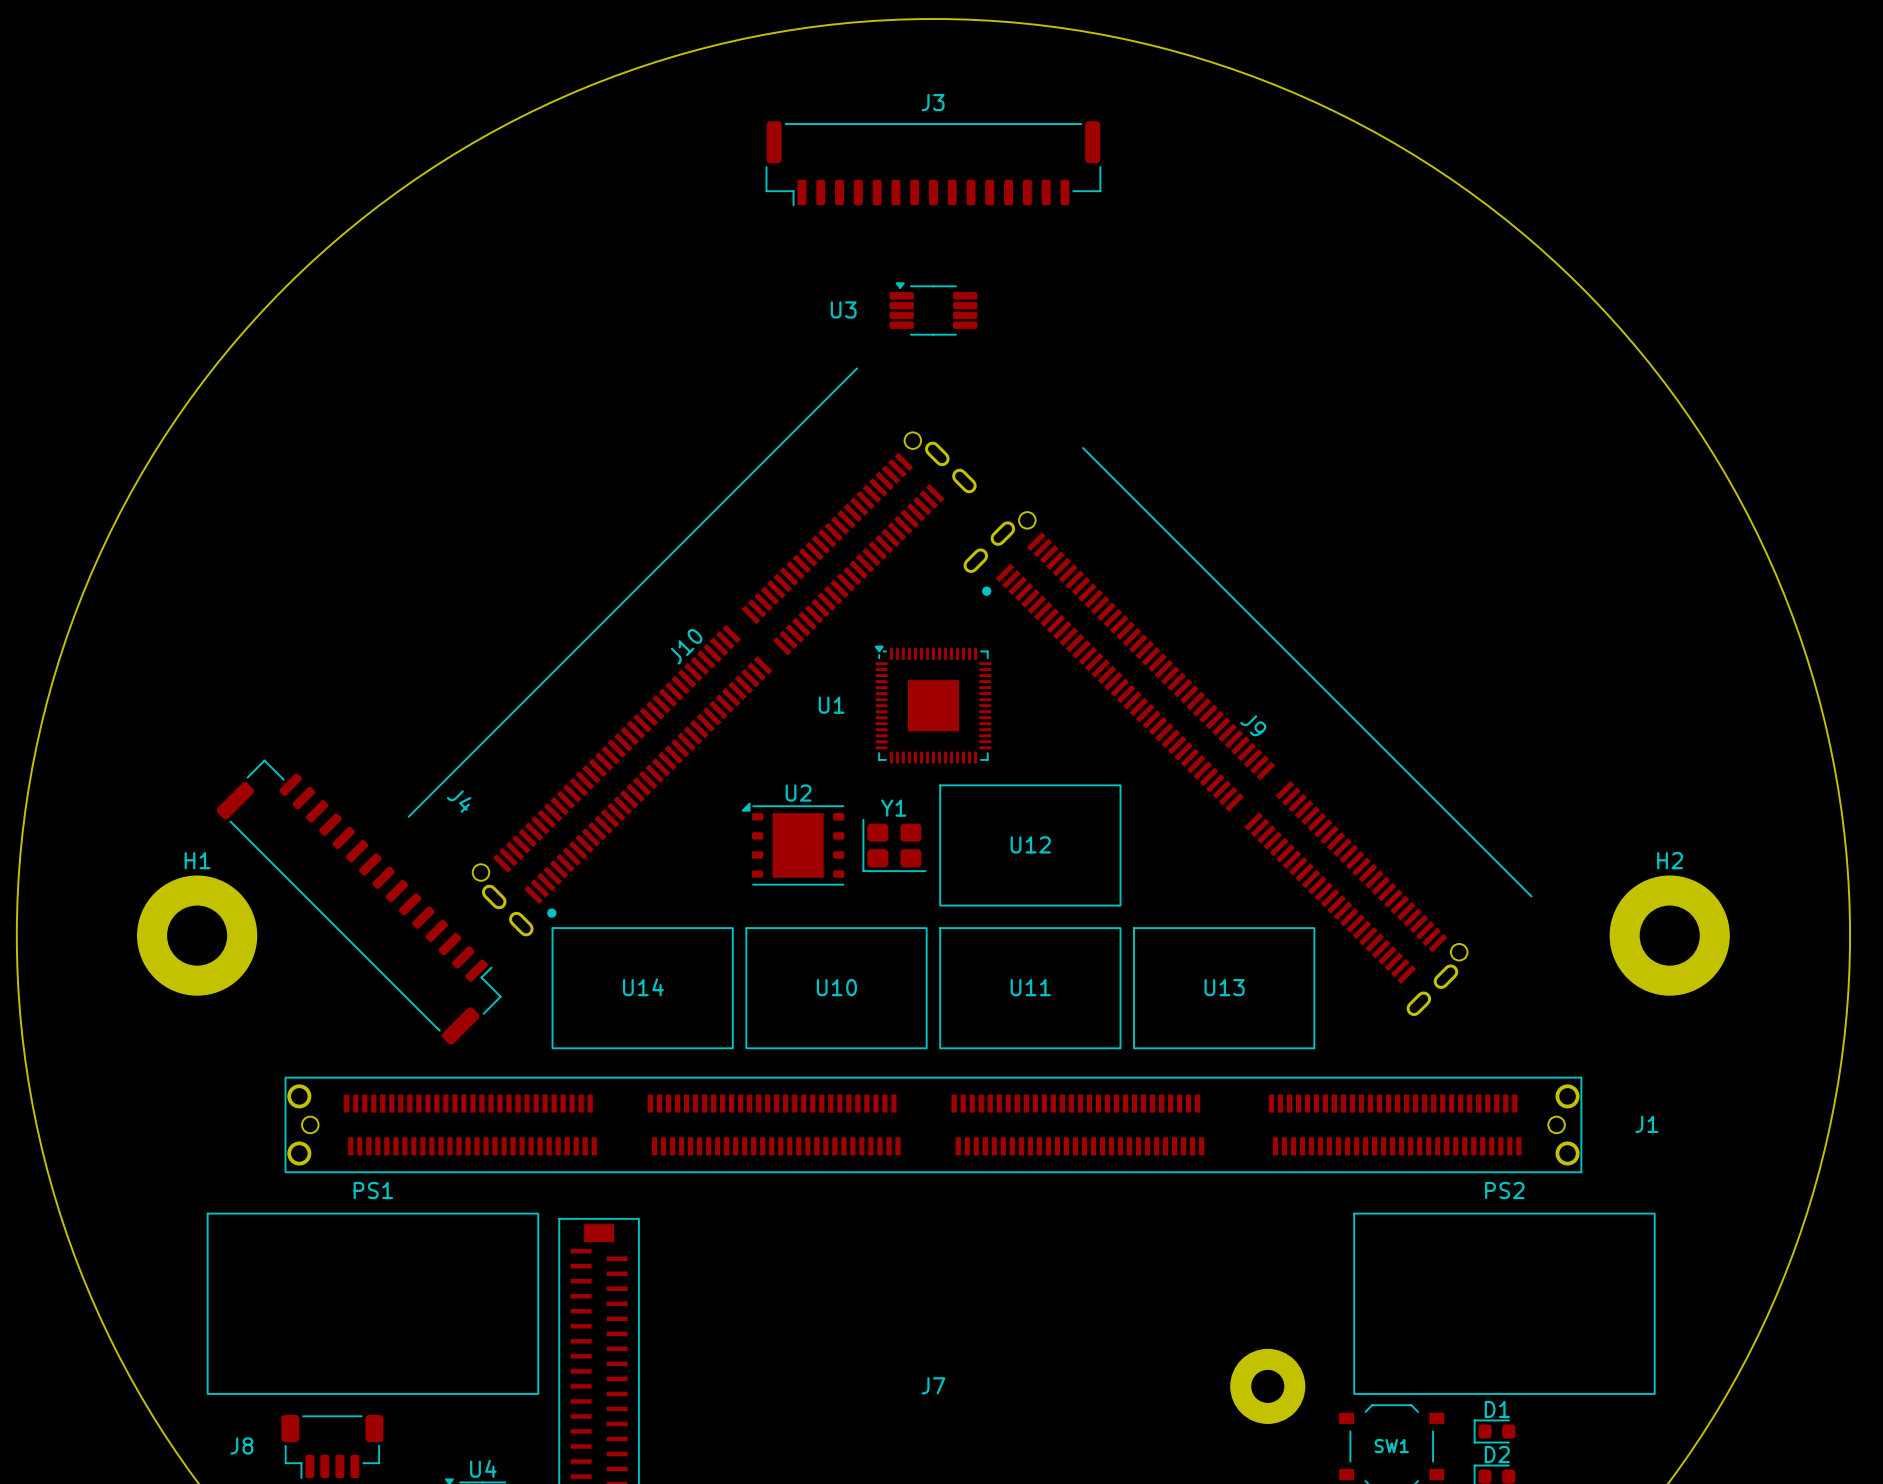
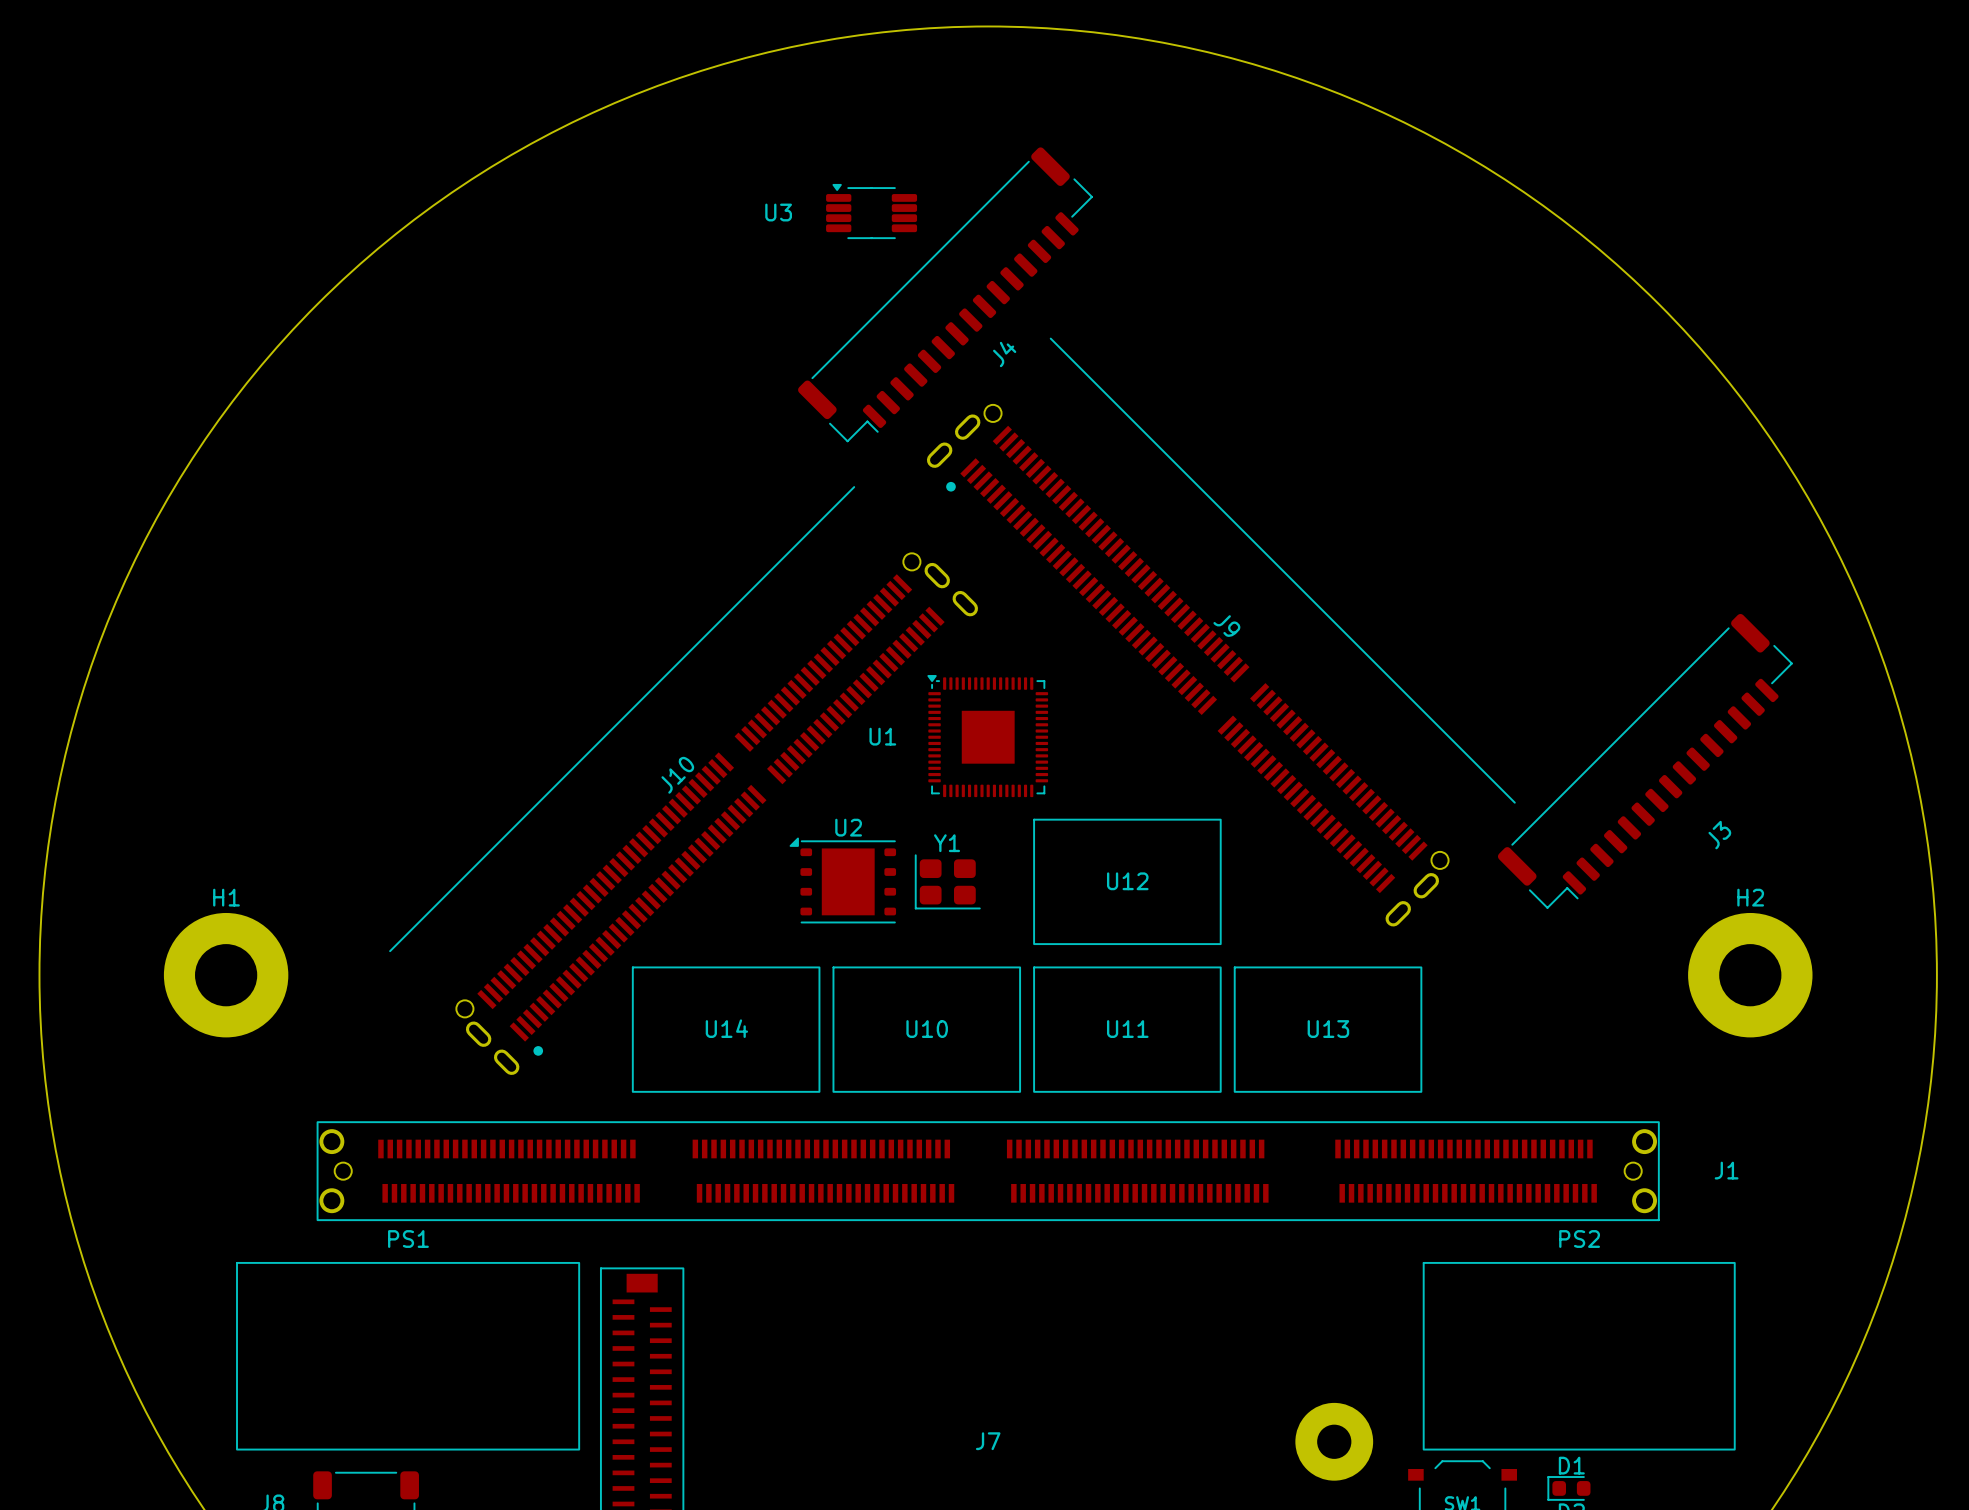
J3 name position: J3 (933, 102) -> J3 (1719, 835)
J3 rotation: 0° (933, 163) -> 45° counterclockwise (1645, 761)
J3 position: (933, 163) -> (1645, 761)
U3 position: (933, 308) -> (871, 211)
J10 position: (692, 651) -> (683, 780)
J9 position: (1247, 731) -> (1221, 632)
J4 name position: J4 (459, 801) -> J4 (1004, 354)
U12 position: (1030, 845) -> (1127, 881)
J4 rotation: 0° (359, 902) -> 90° clockwise (945, 294)
J4 position: (359, 902) -> (945, 294)
U14 position: (642, 988) -> (726, 1029)
U10 position: (836, 988) -> (926, 1029)
U11 position: (1030, 988) -> (1127, 1029)
U13 position: (1224, 988) -> (1328, 1029)

